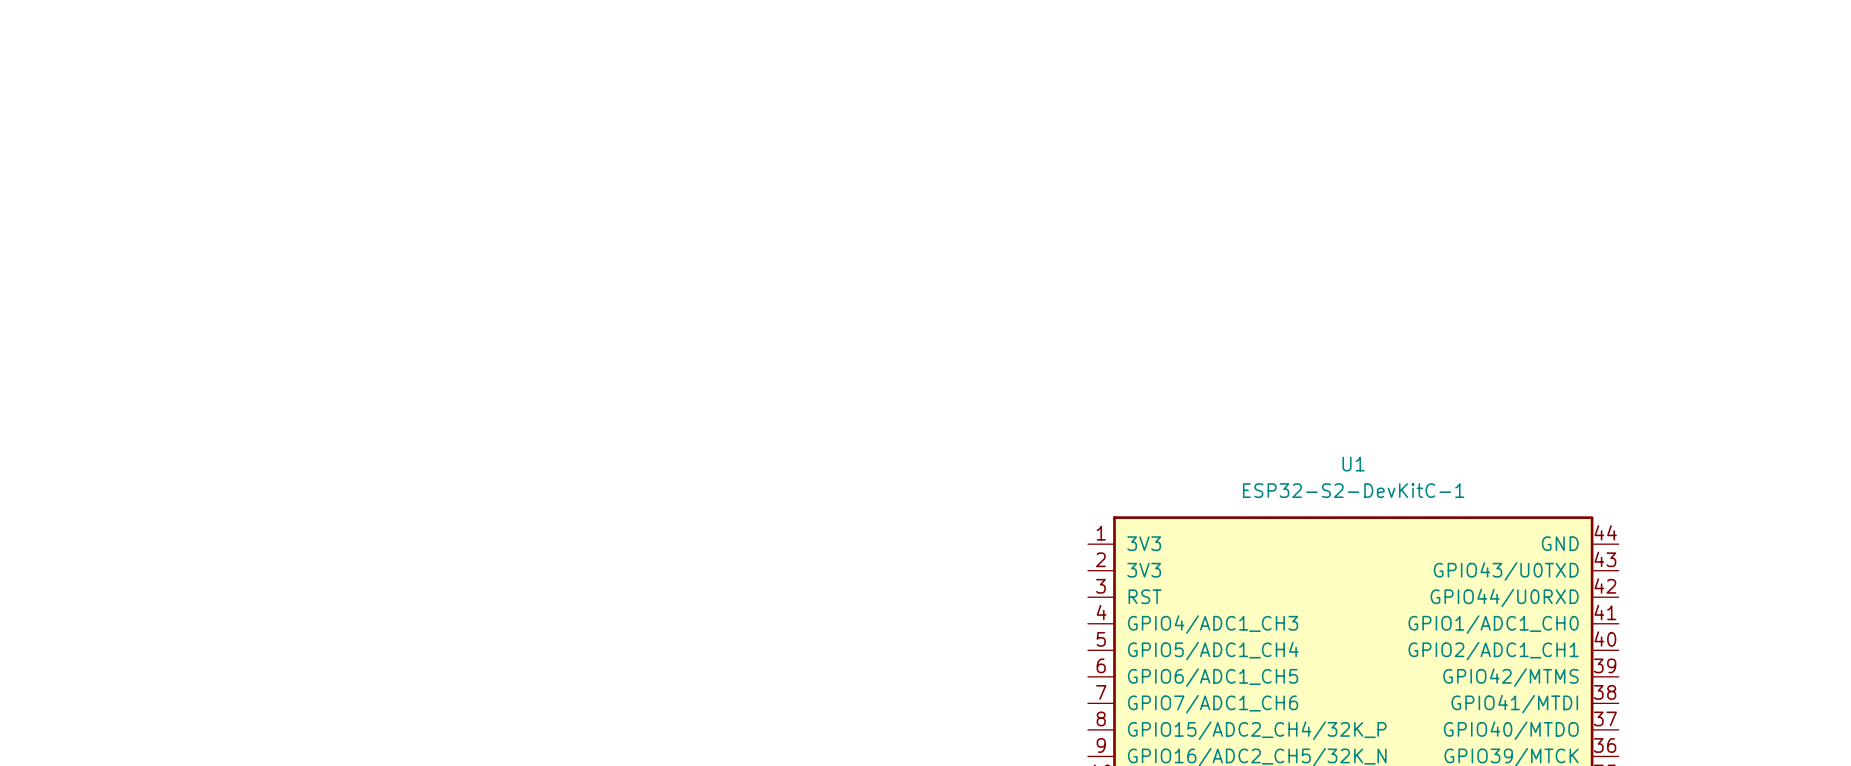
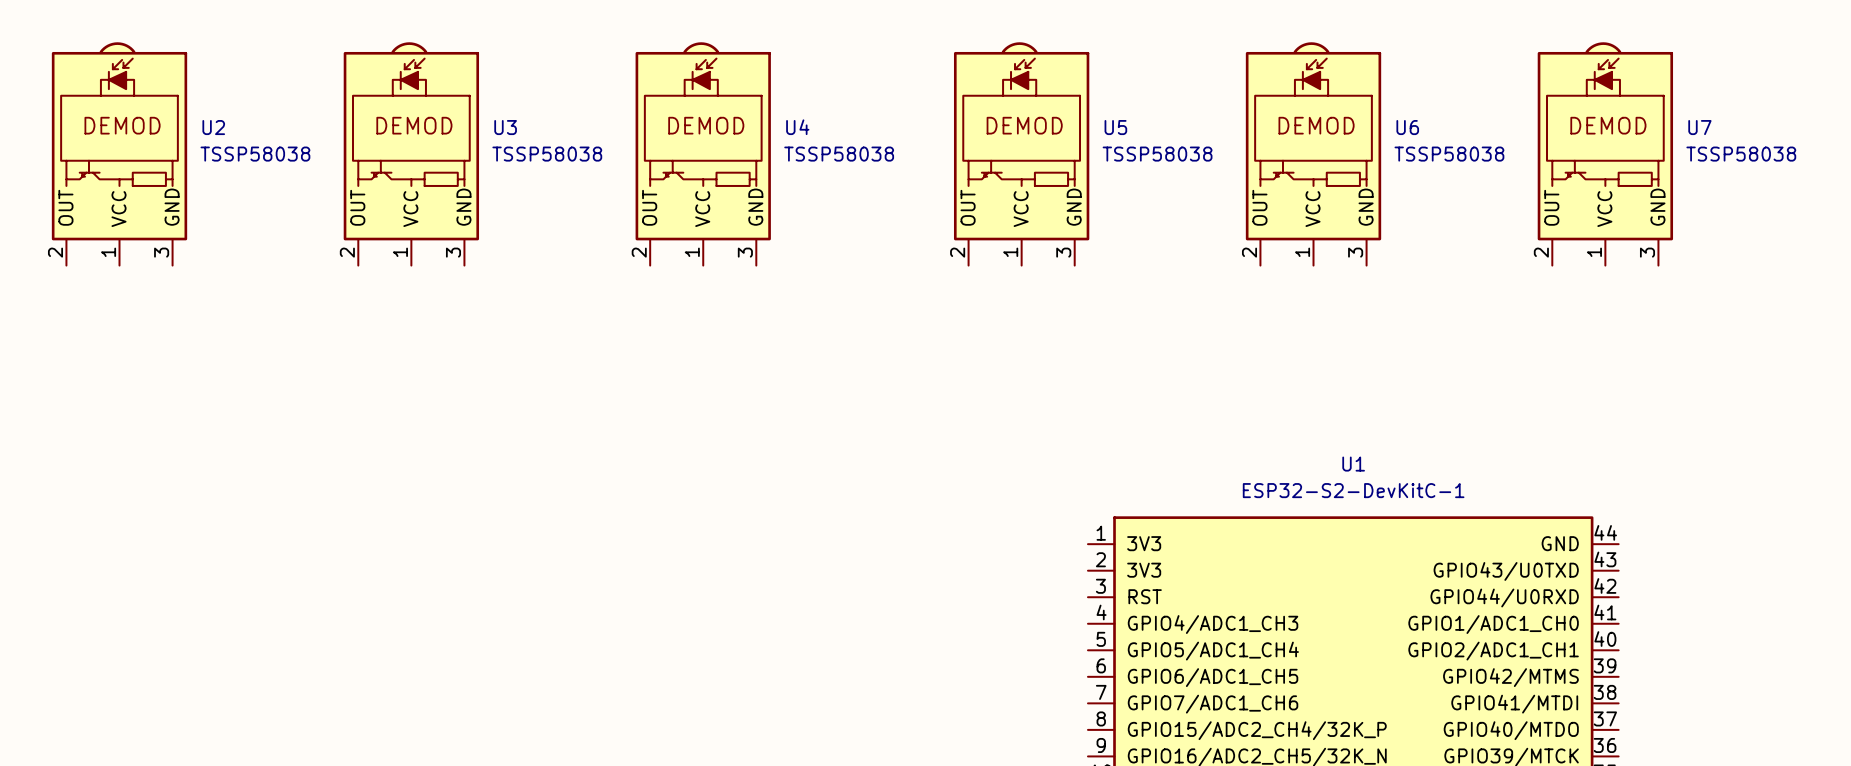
U2: none -> TSSP58038 (119, 153)
U3: none -> TSSP58038 (411, 153)
U4: none -> TSSP58038 (703, 153)
U5: none -> TSSP58038 (1021, 153)
U6: none -> TSSP58038 (1313, 153)
U7: none -> TSSP58038 (1605, 153)

